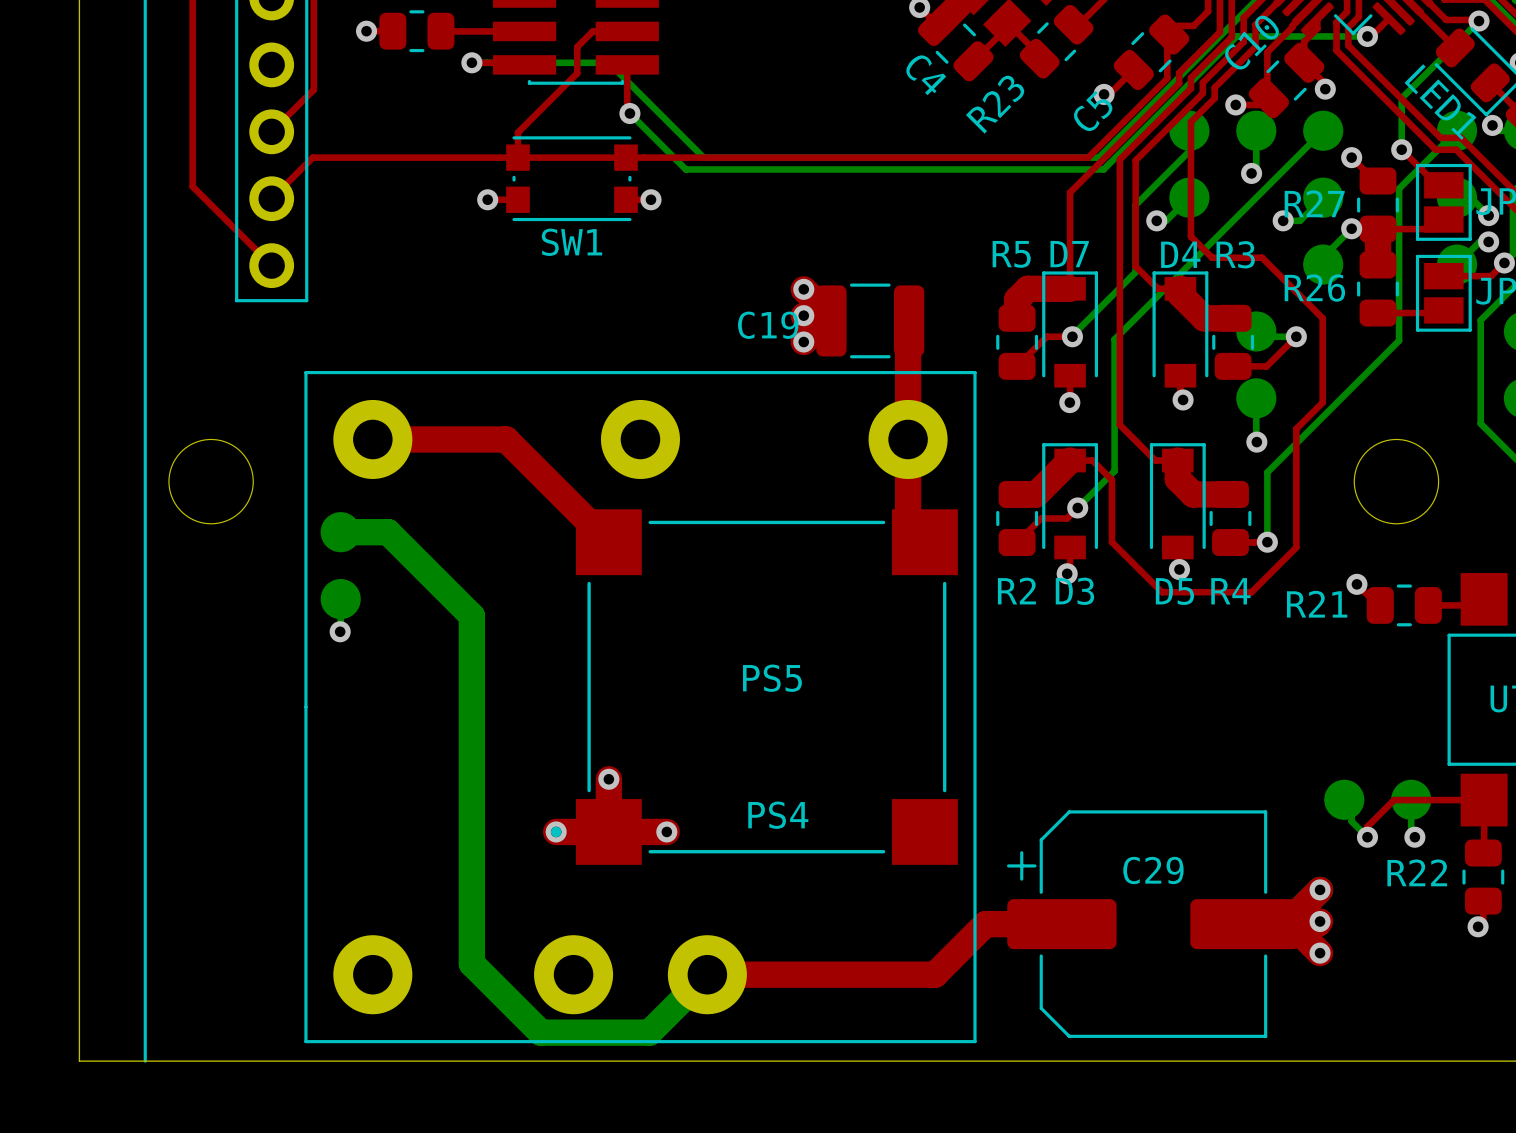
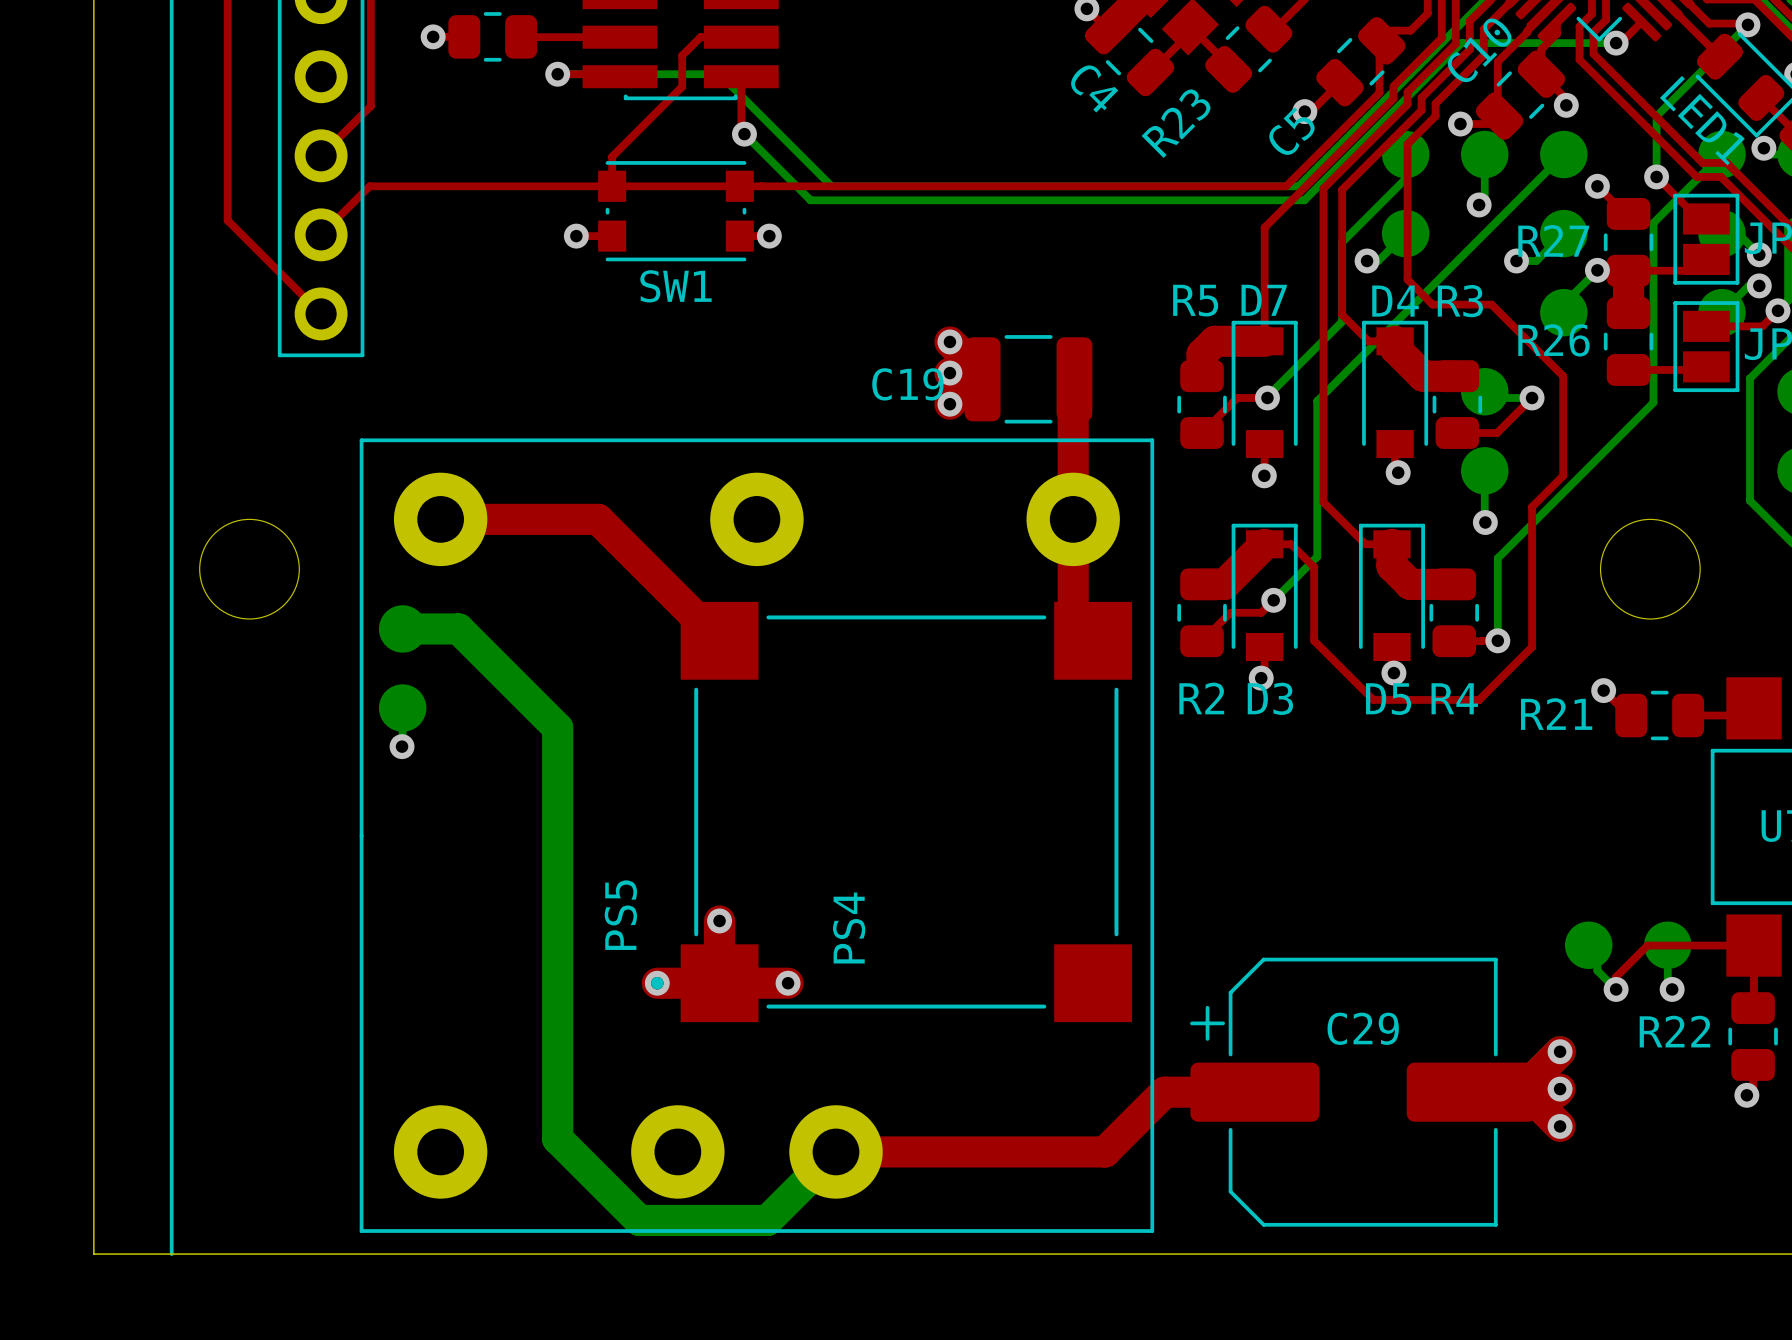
PS5 name rotation: 0° (772, 678) -> 90° counterclockwise (620, 915)
PS5 name position: PS5 (772, 678) -> PS5 (620, 915)
PS4 name rotation: 0° (778, 815) -> 90° counterclockwise (849, 928)

